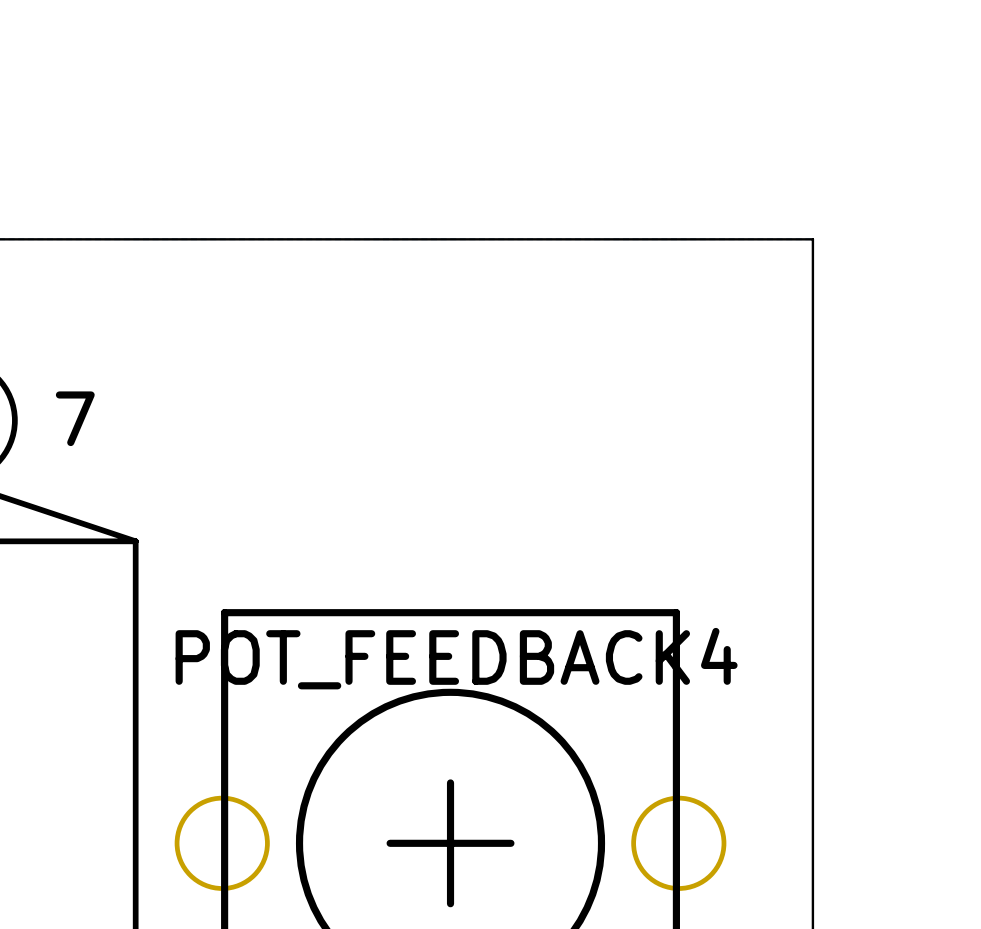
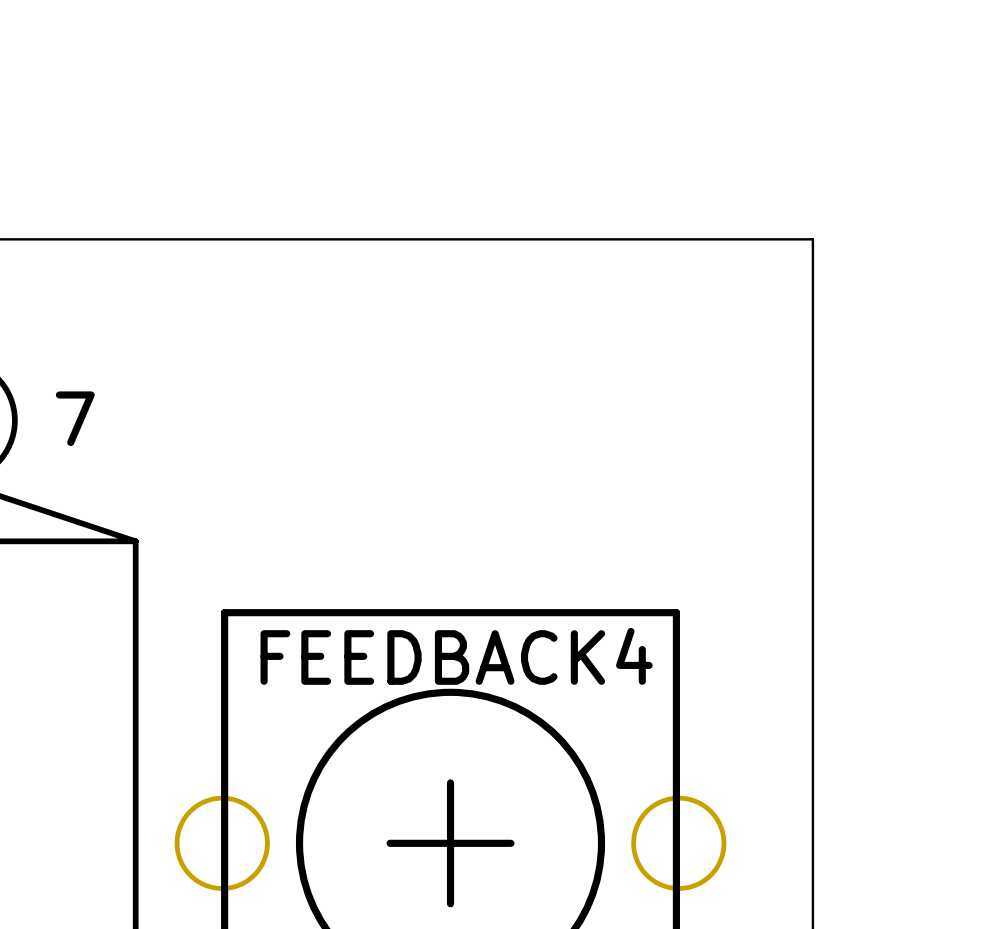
POT_FEEDBACK4 name: POT_FEEDBACK4 (456, 658) -> FEEDBACK4 (456, 656)

